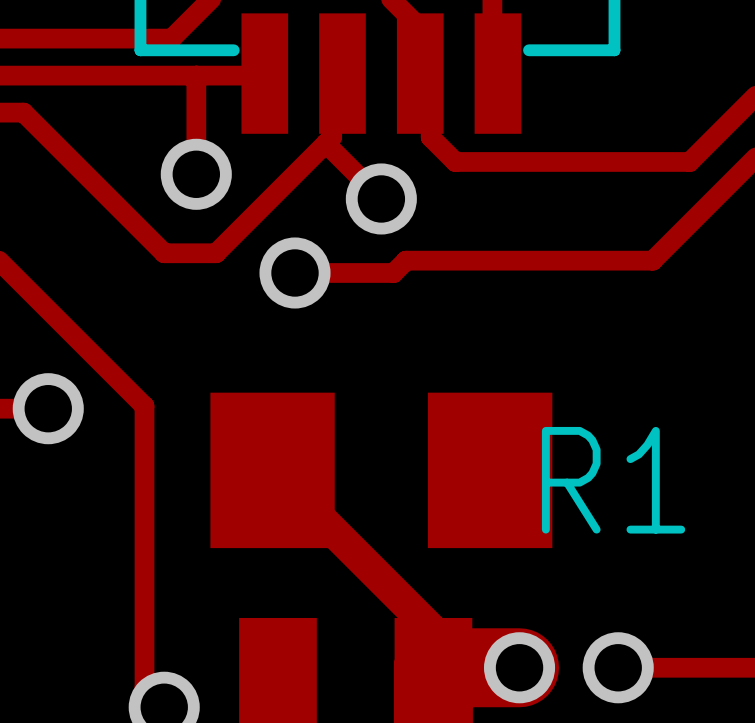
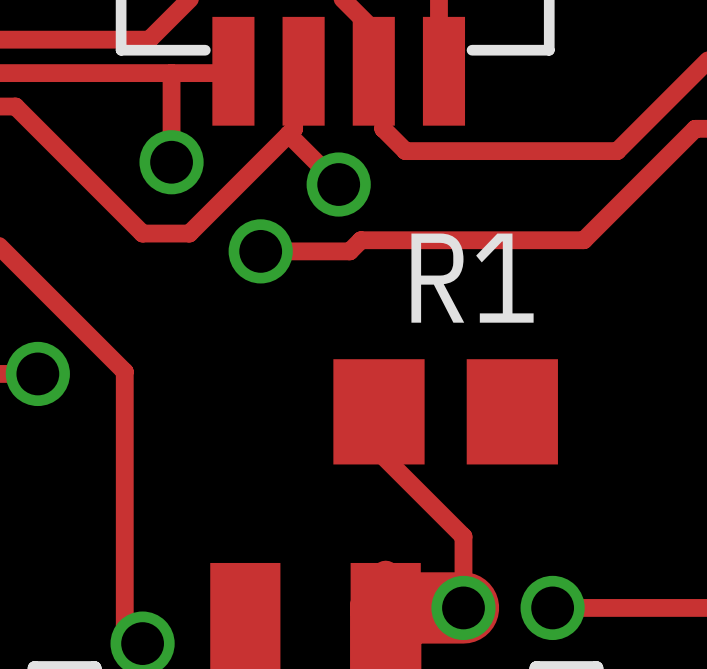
R1 footprint: [210, 392, 553, 549] -> [333, 359, 558, 465]
track: none -> (378, 411) (378, 452) (463, 536) (463, 607)
track: (272, 470) (433, 631) -> none
R1 name position: R1 (613, 480) -> R1 (472, 278)

